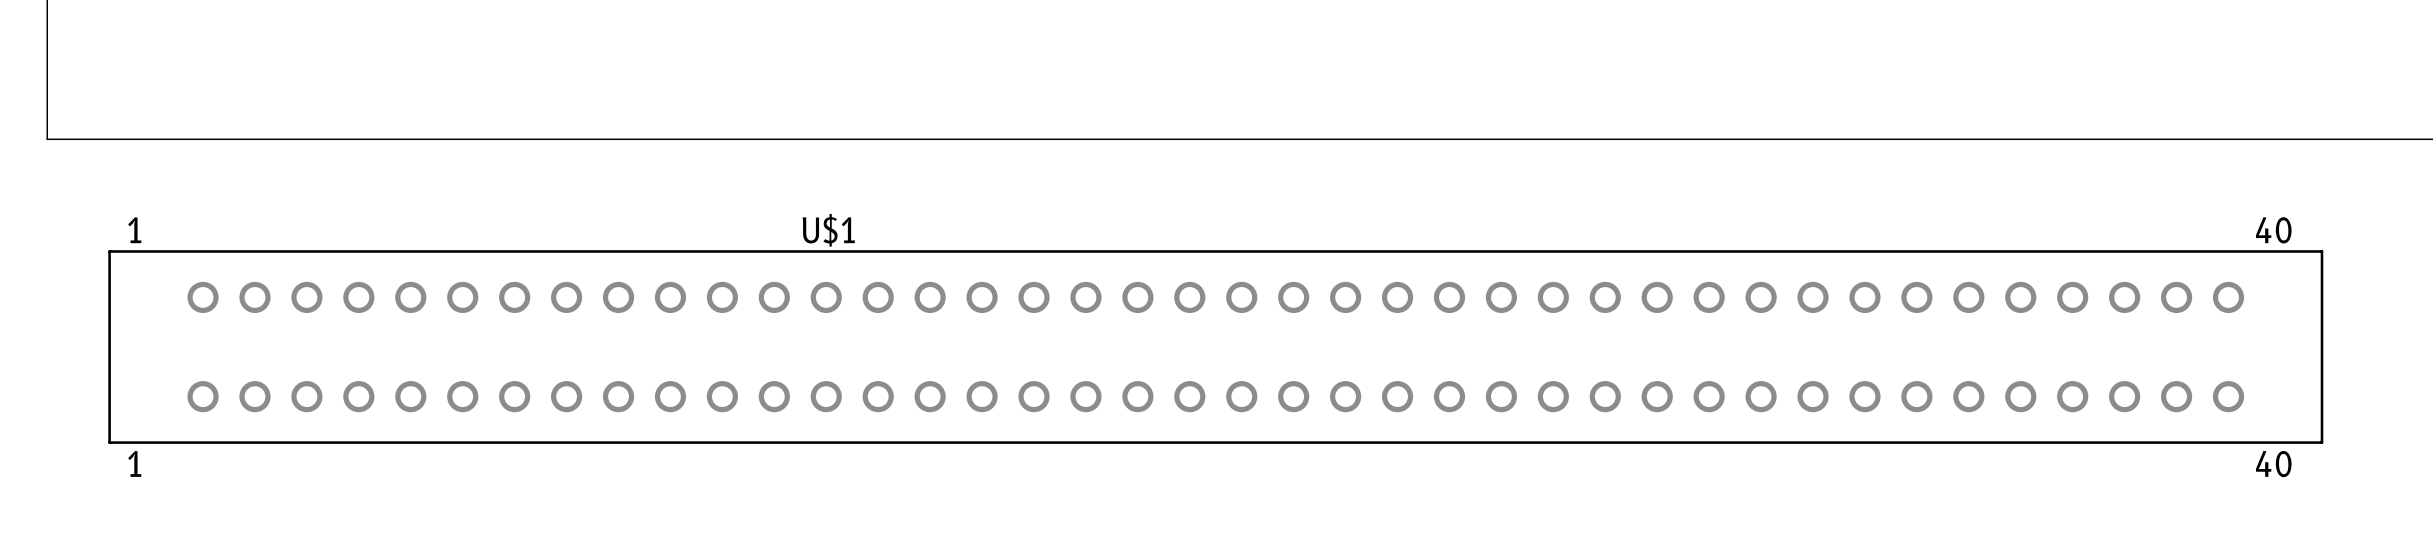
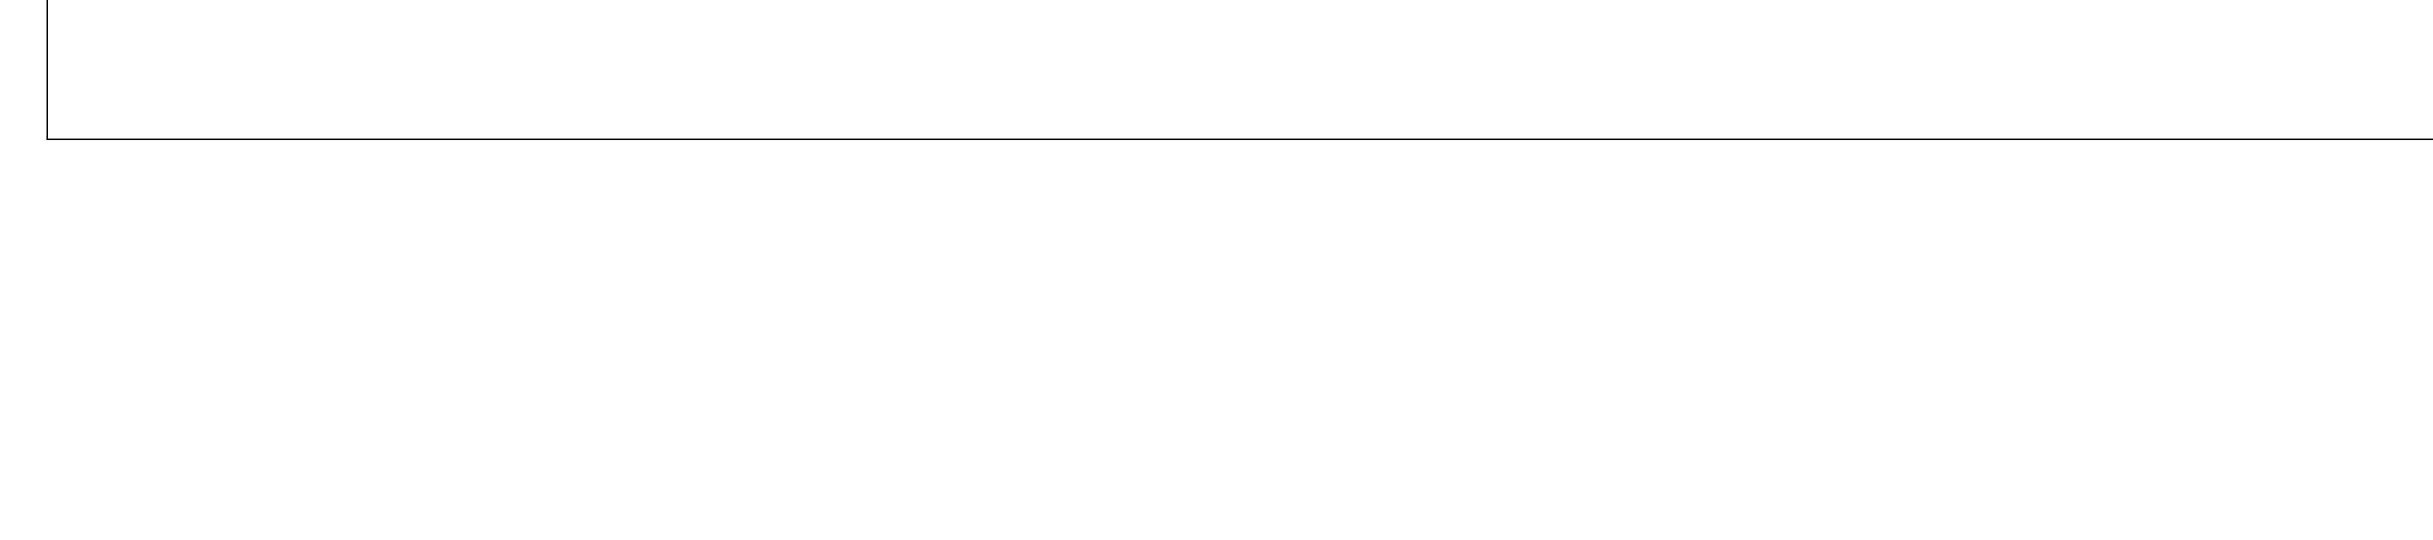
U$1: (1215, 347) -> none

